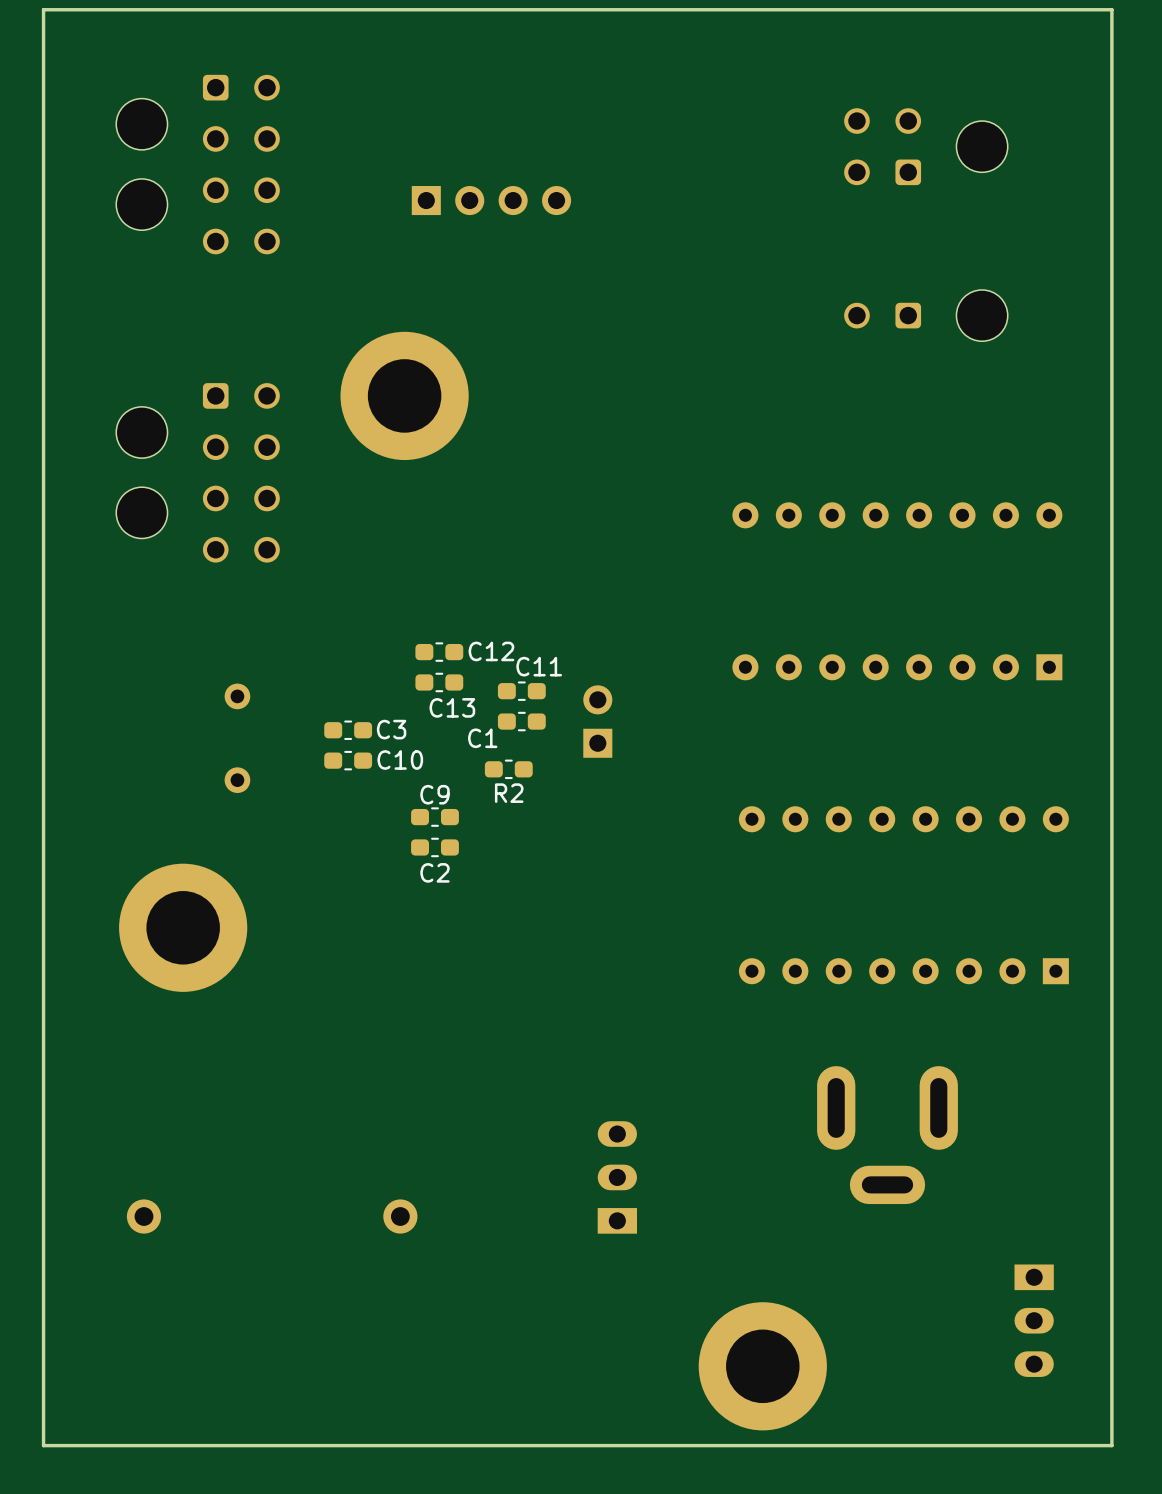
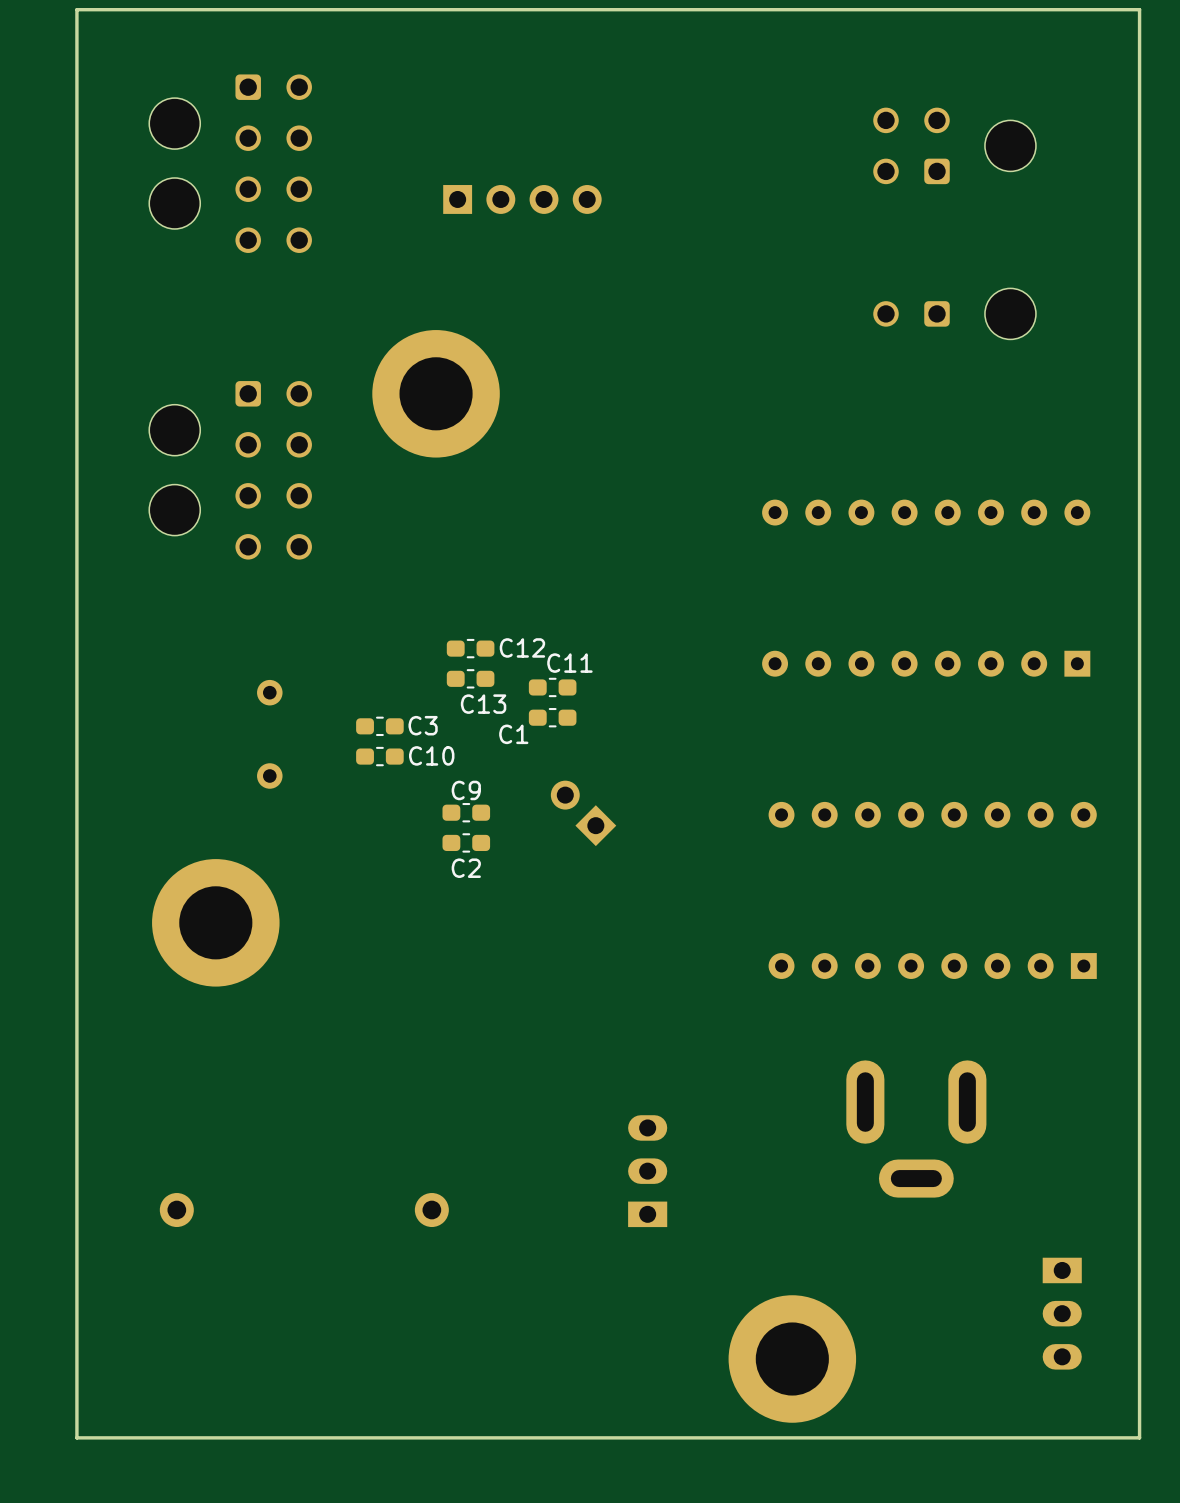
part: (597, 721) -> none
R2: (508, 769) -> none
part: none -> (583, 813)

